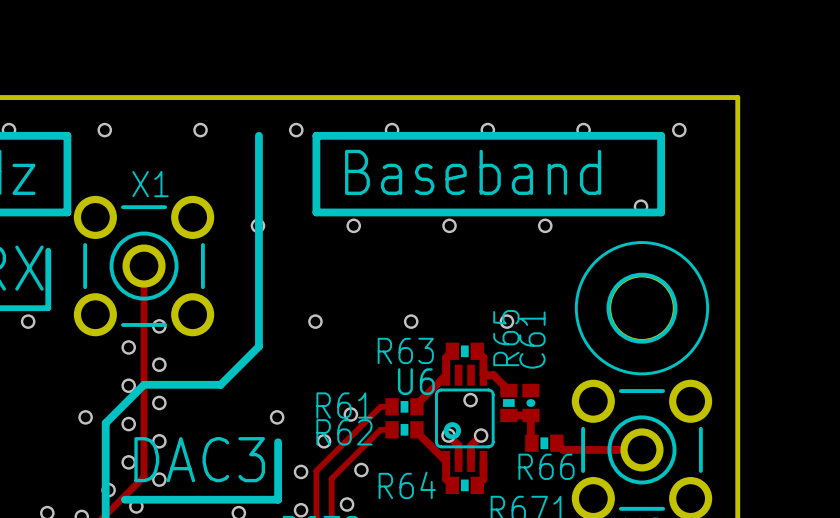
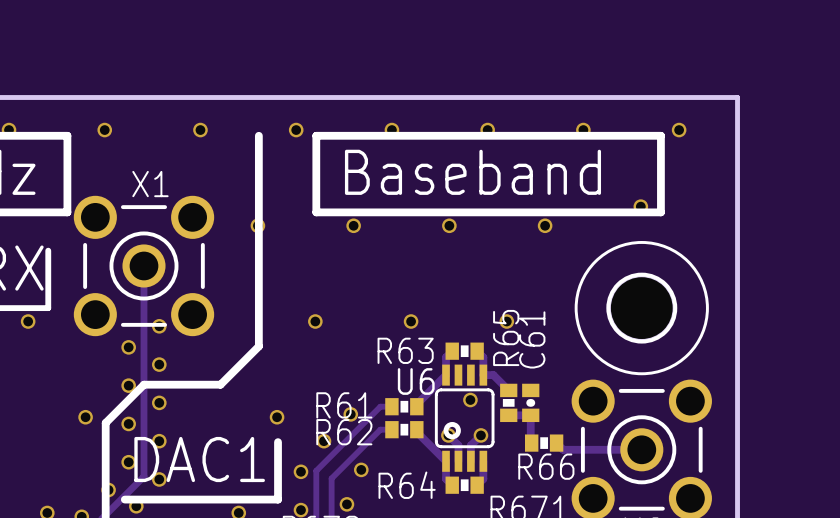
text: DAC3 (199, 459) -> DAC1 (199, 459)

